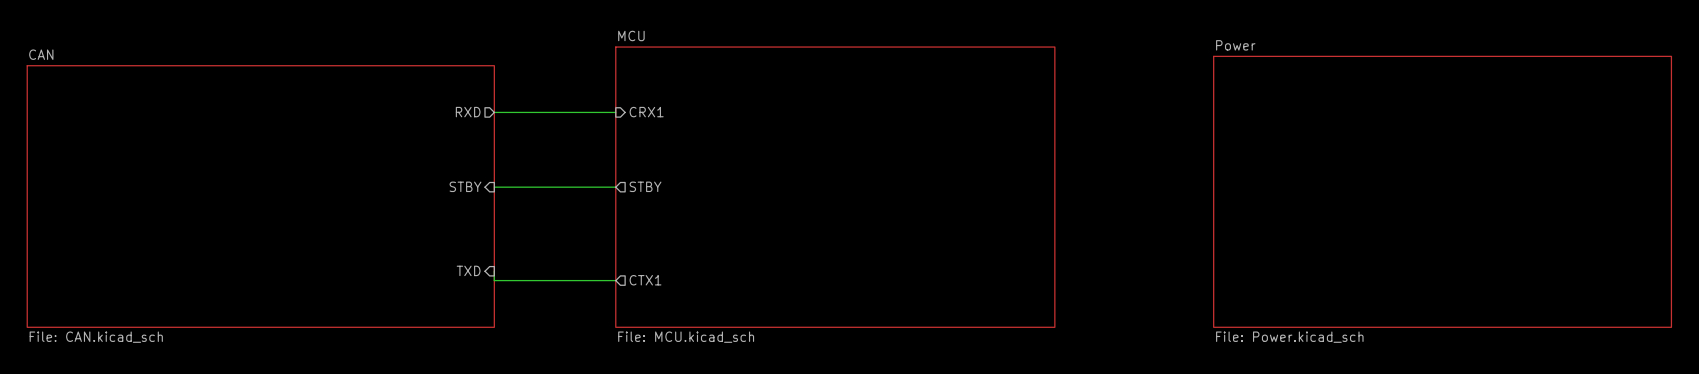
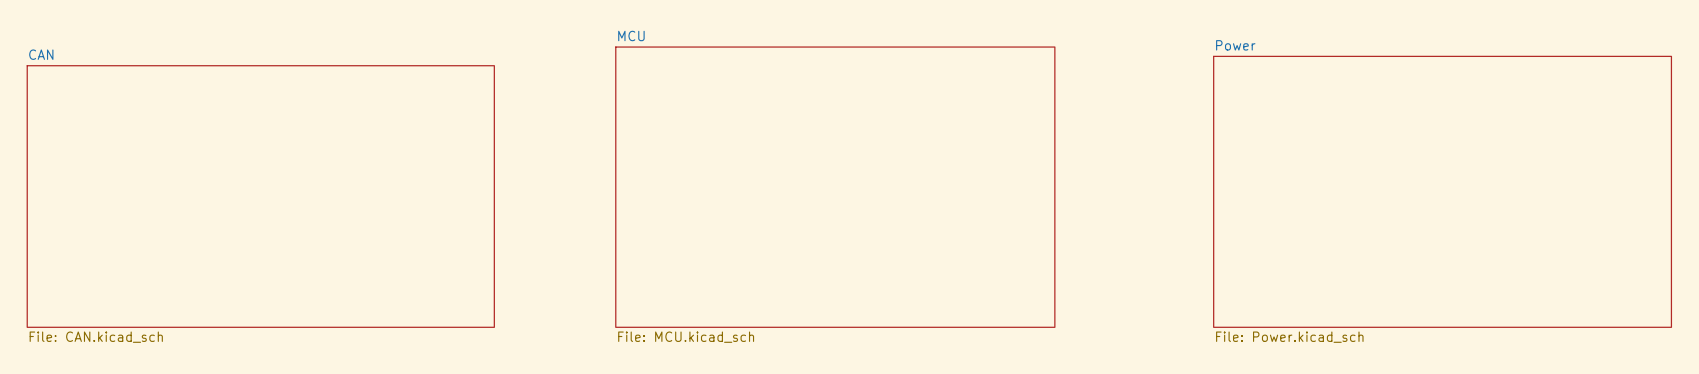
sheet pin: RXD (468, 112) -> none
wire: (494, 112) (615, 112) -> none
sheet pin: CRX1 (646, 112) -> none
sheet pin: STBY (465, 186) -> none
sheet pin: STBY (645, 186) -> none
wire: (494, 187) (615, 187) -> none
sheet pin: TXD (468, 270) -> none
wire: (494, 271) (494, 280) (615, 280) -> none
sheet pin: CTX1 (645, 280) -> none

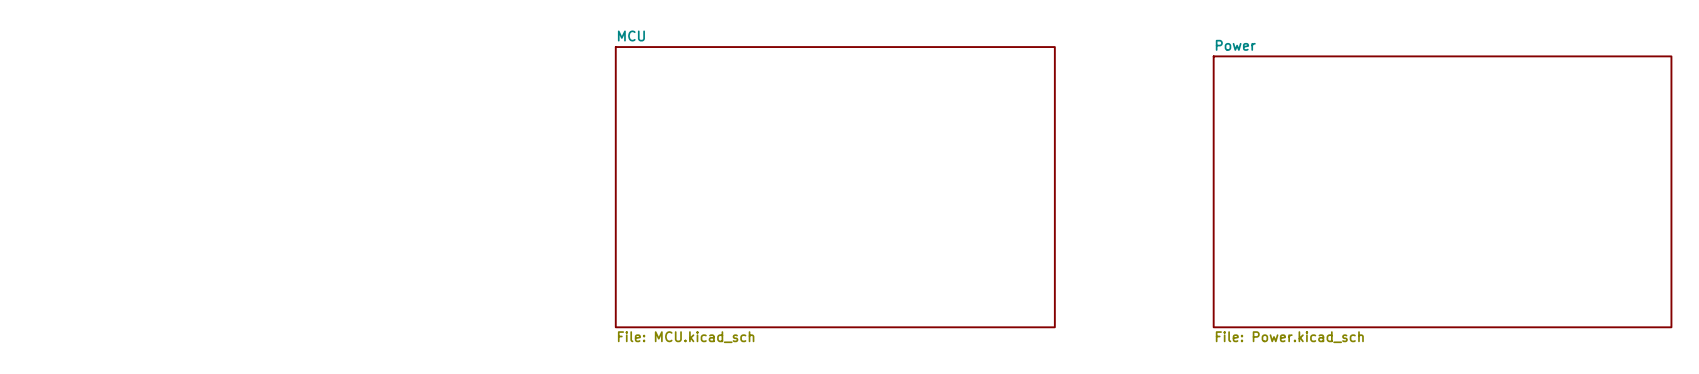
sheet CAN: File: CAN.kicad_sch (260, 196) -> none

